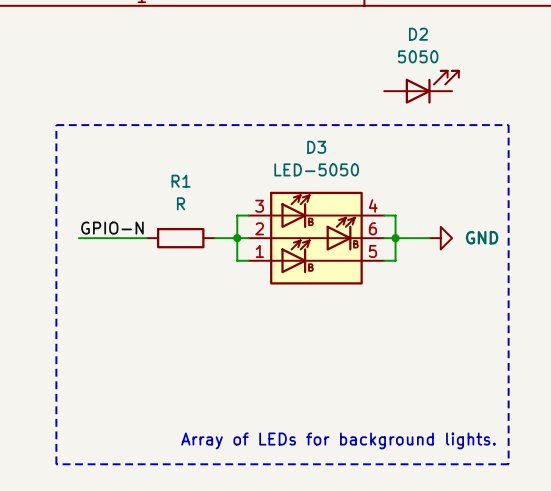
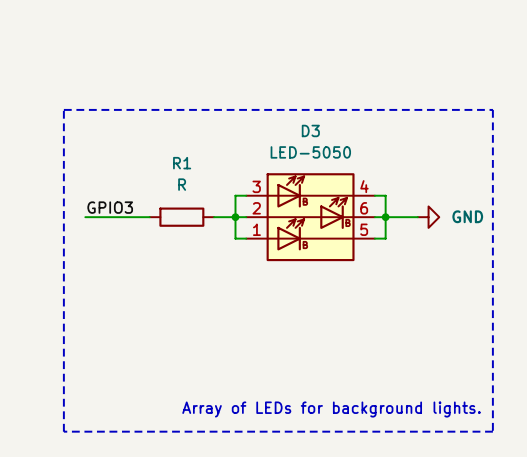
D2: 5050 (421, 87) -> none
label: GPIO-N (112, 228) -> GPIO3 (110, 207)

